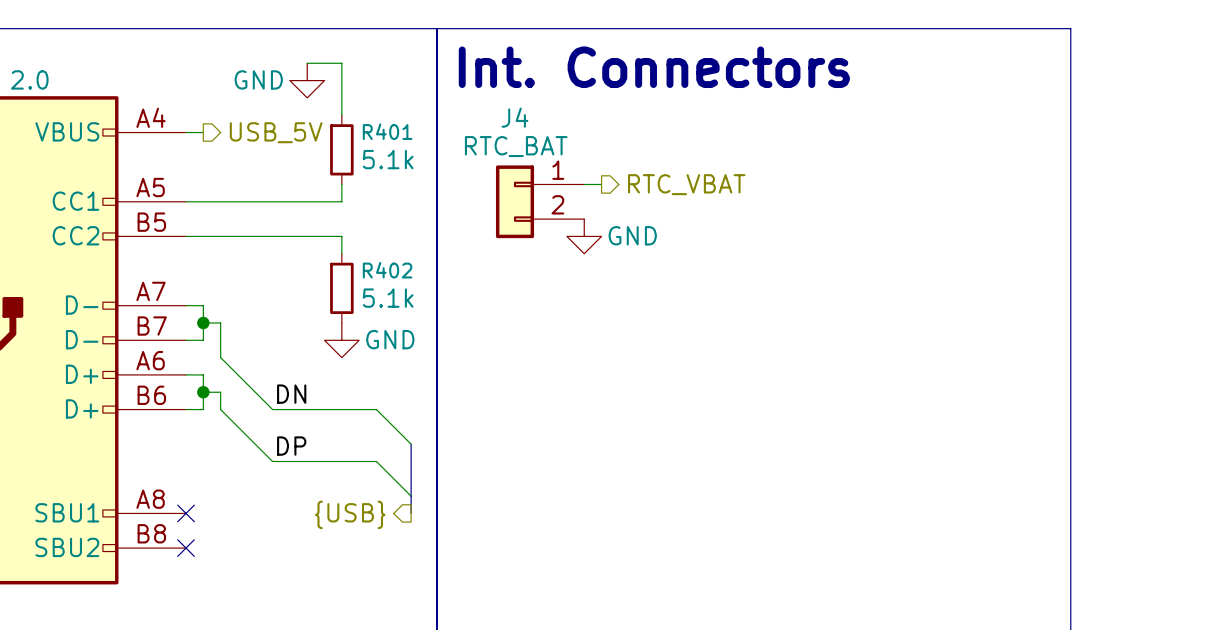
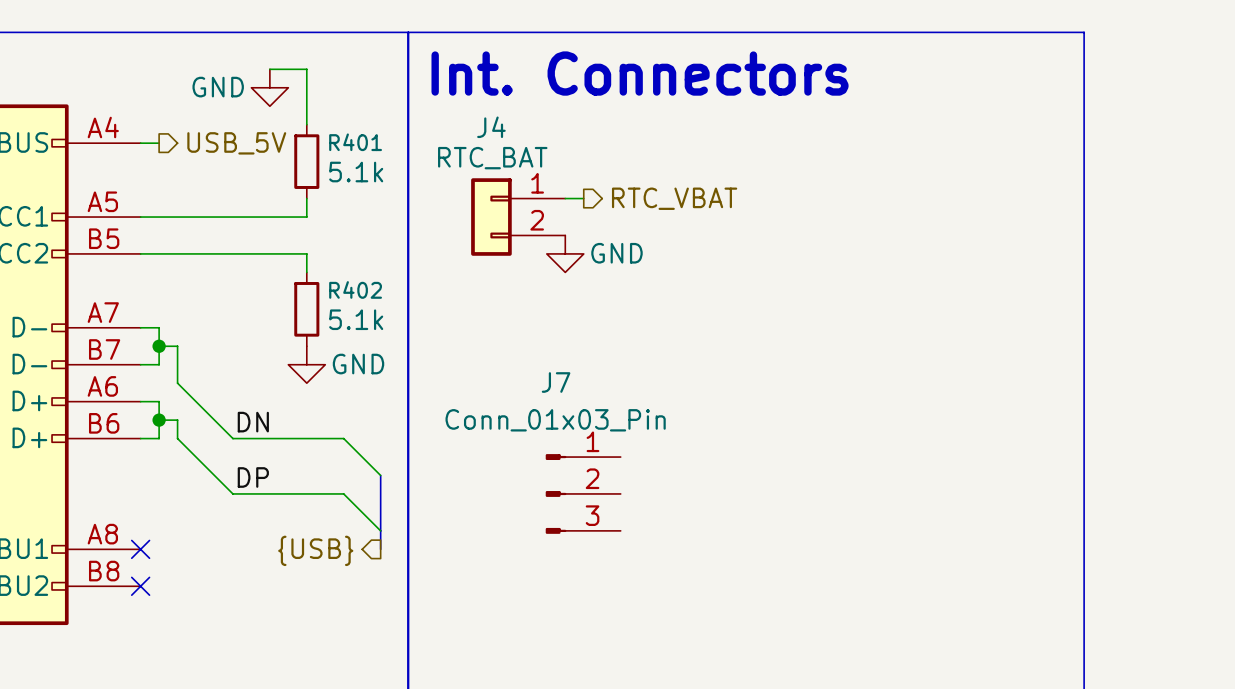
J7: none -> Conn_01x03_Pin (583, 493)

